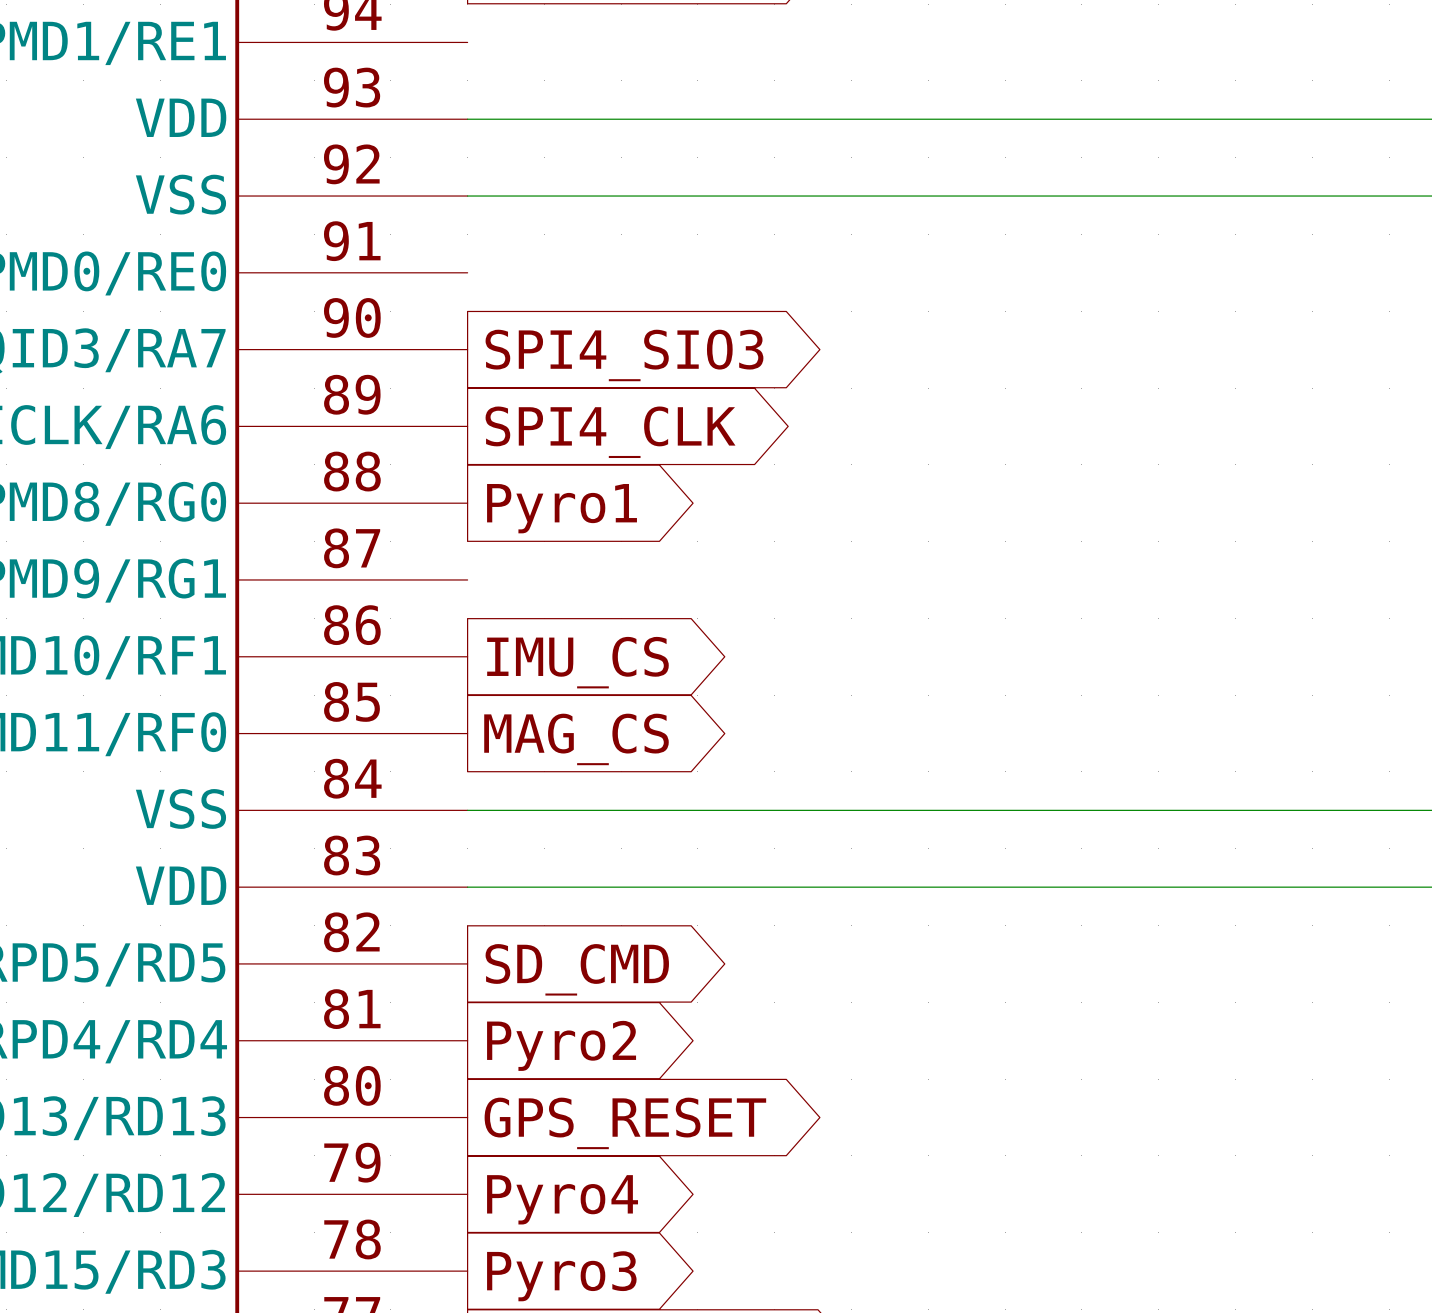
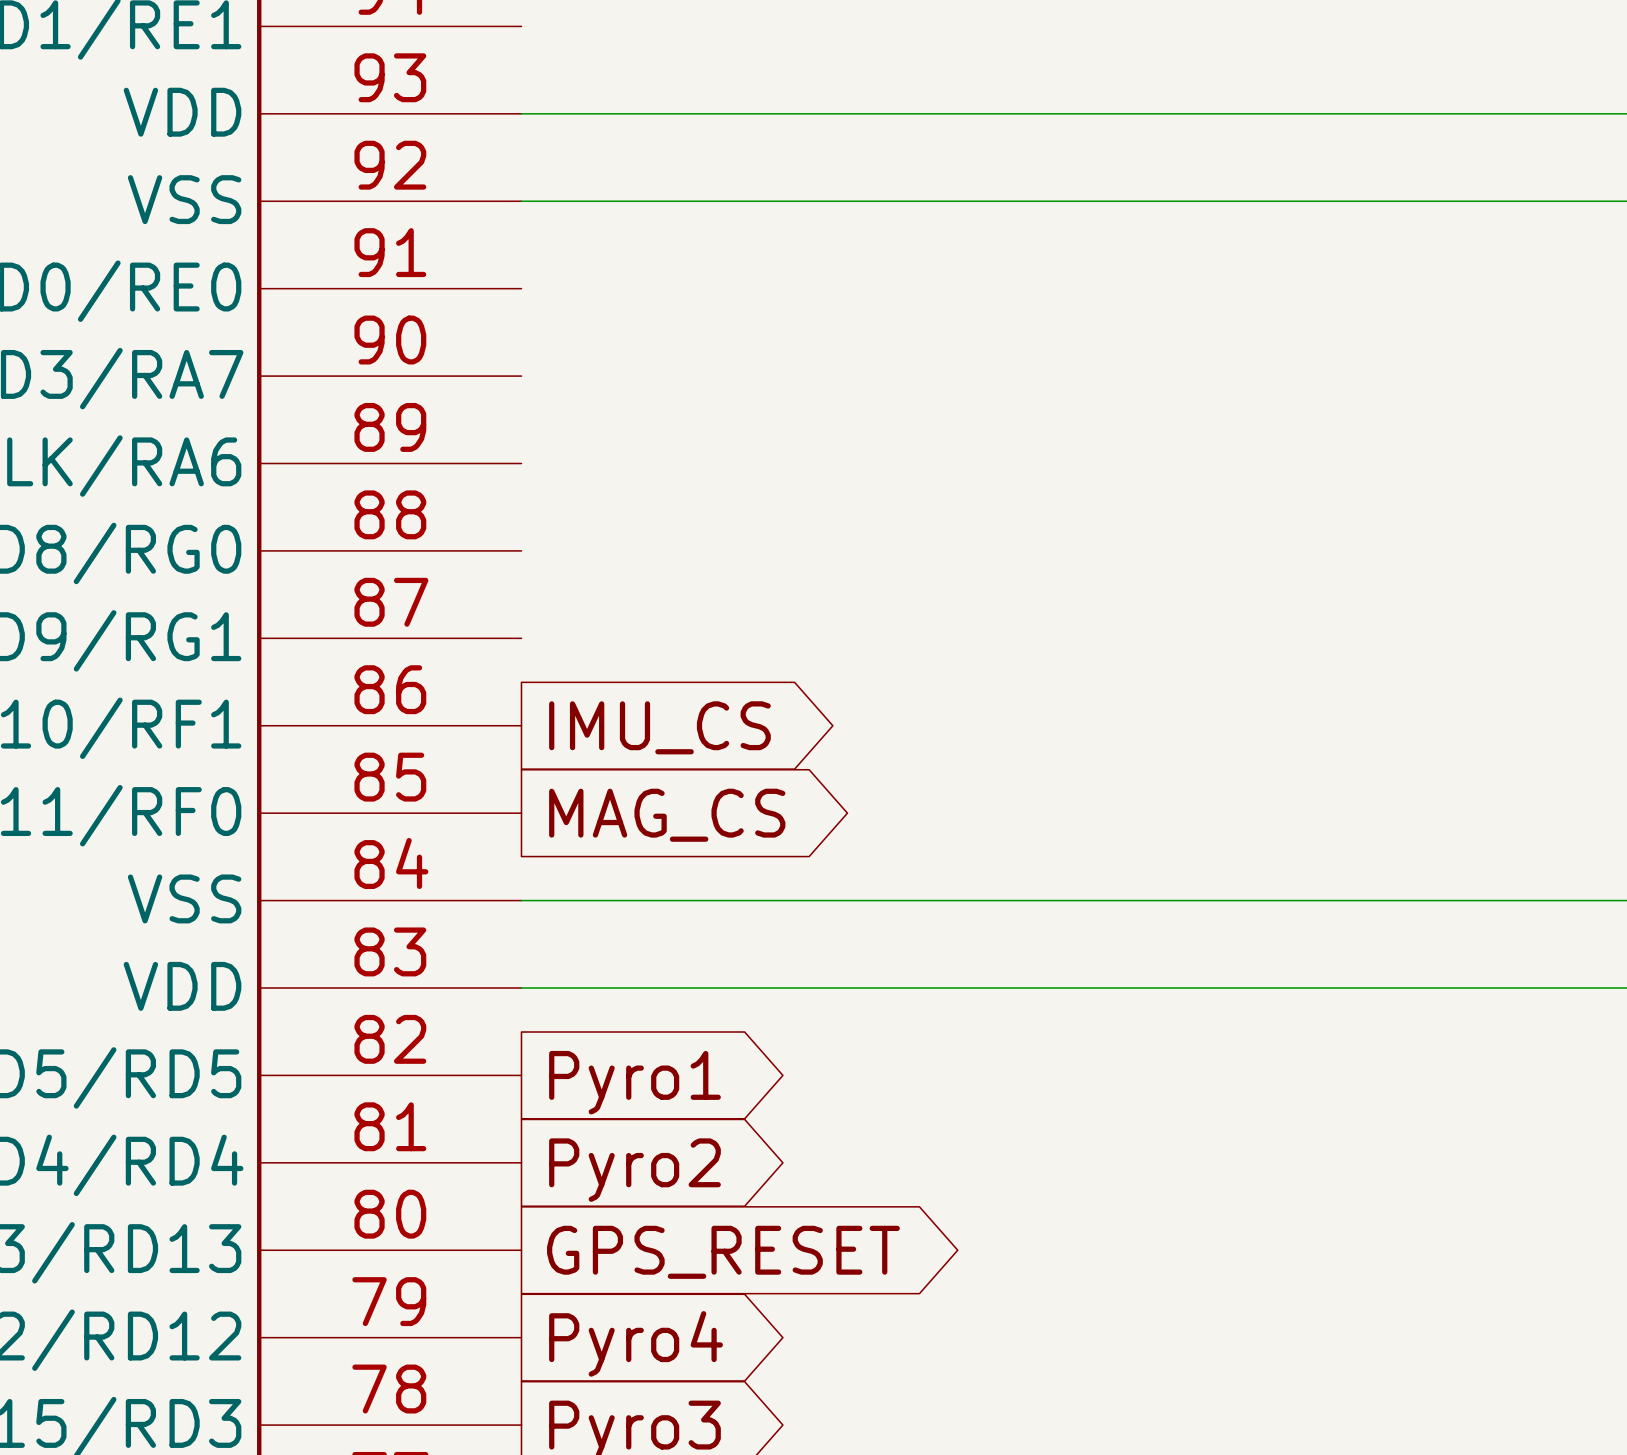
global label: SPI4_SIO3 (624, 355) -> none
global label: SPI4_CLK (610, 432) -> none
global label: Pyro1 (562, 508) -> none
global label: SD_CMD (577, 969) -> Pyro1 (634, 1082)

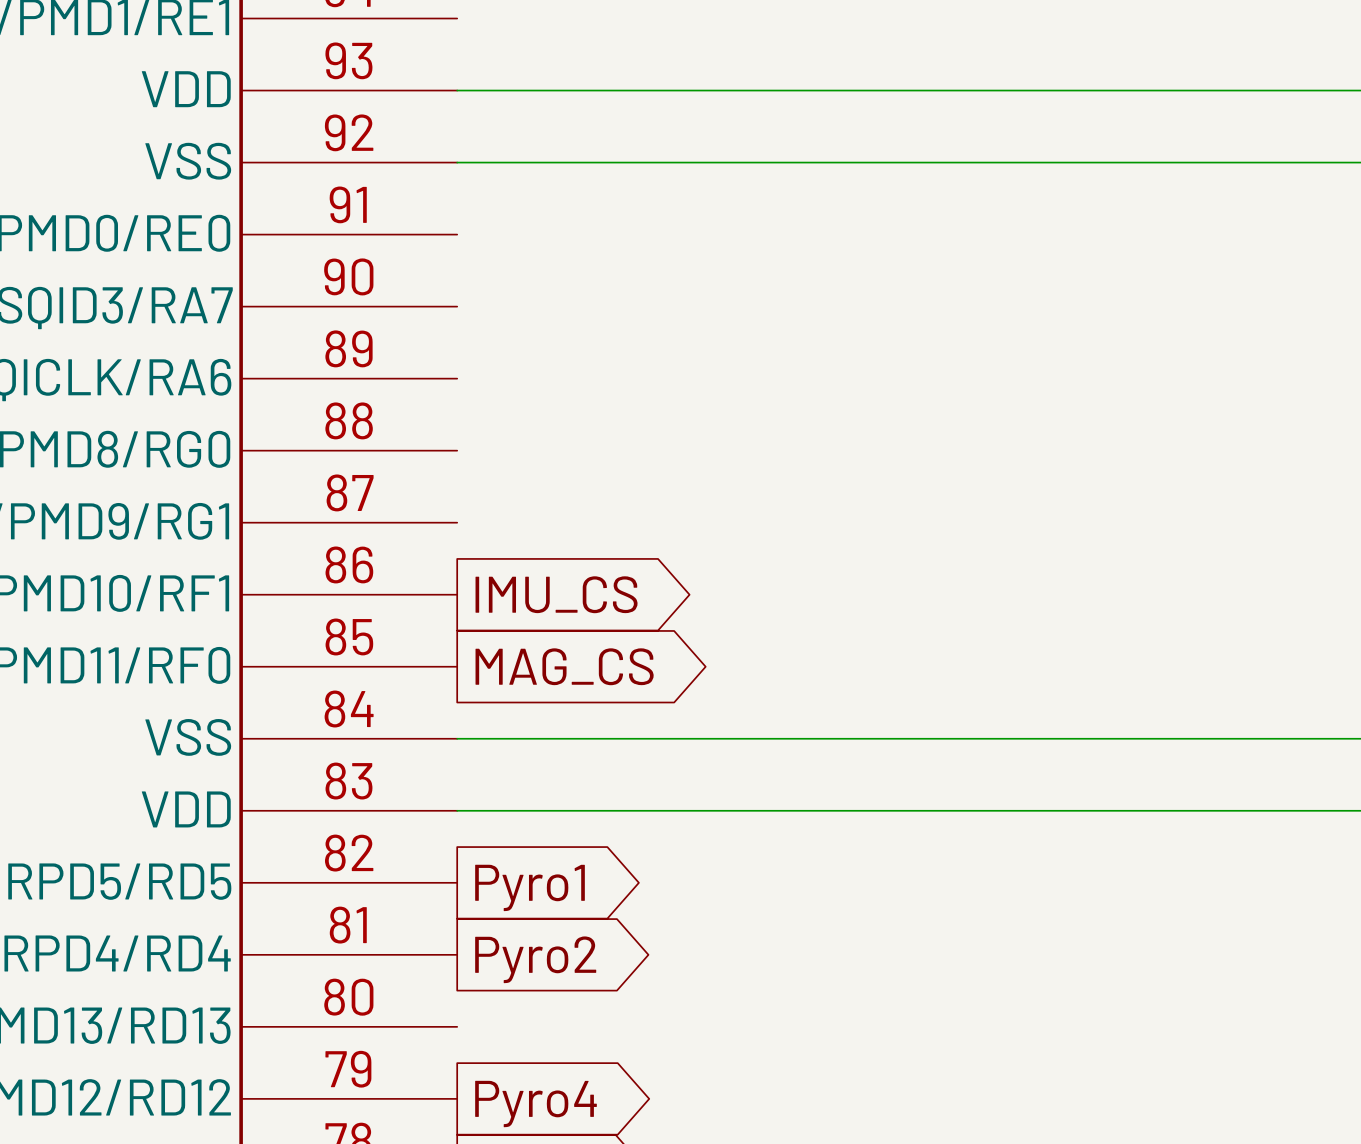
global label: GPS_RESET (723, 1252) -> none

